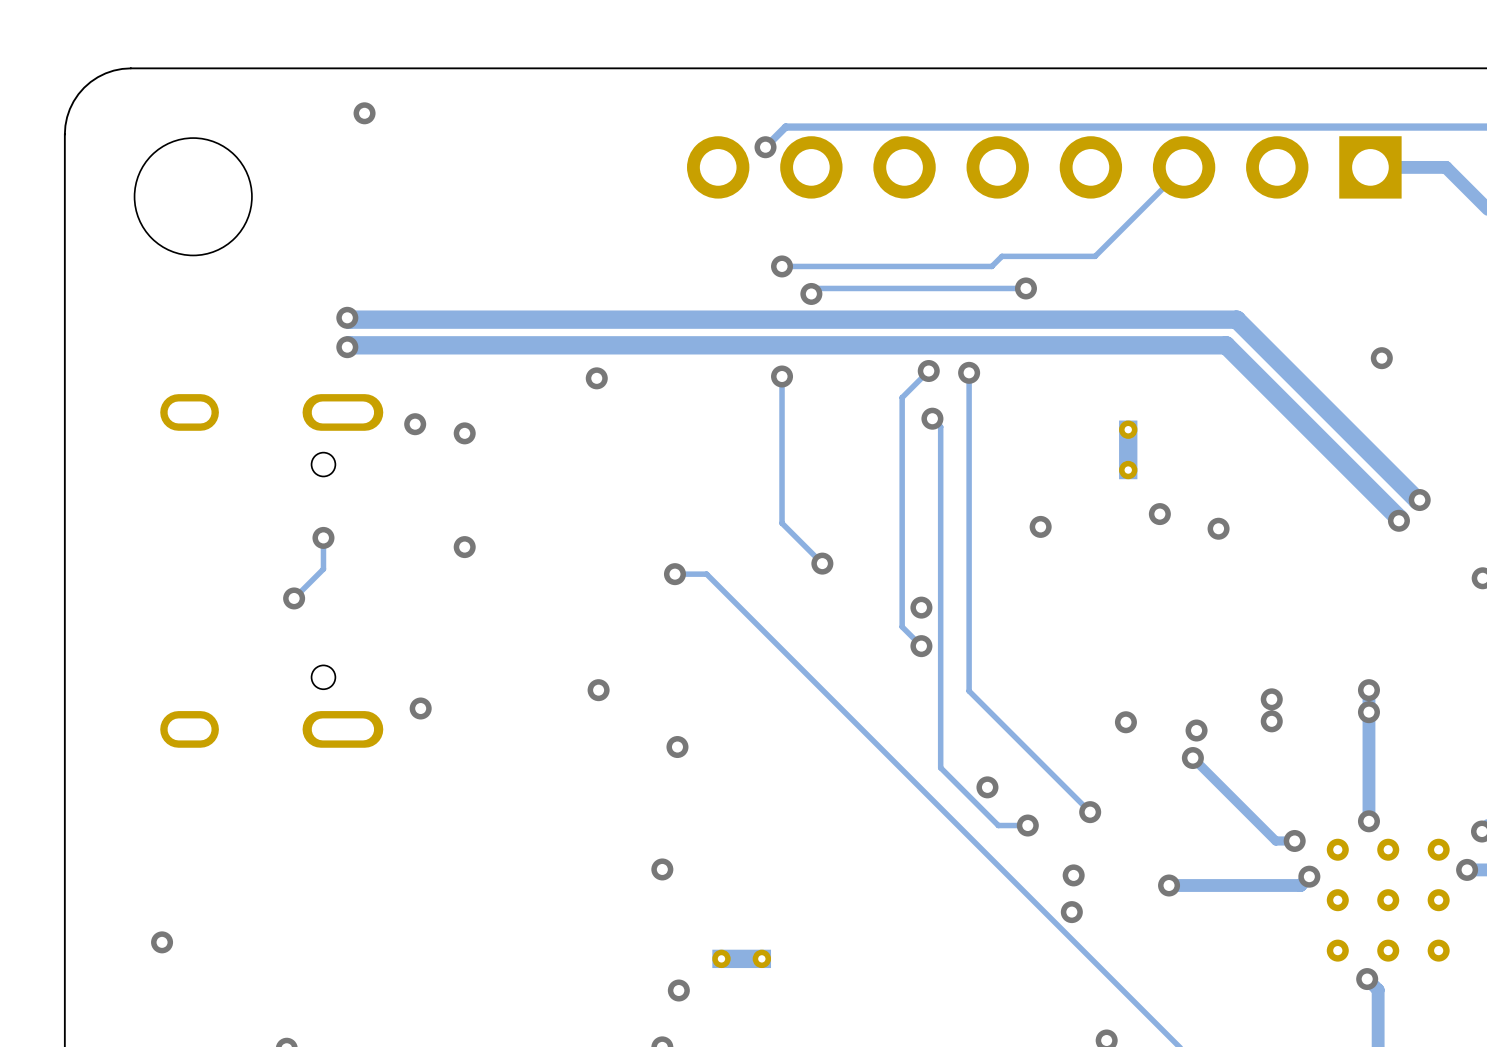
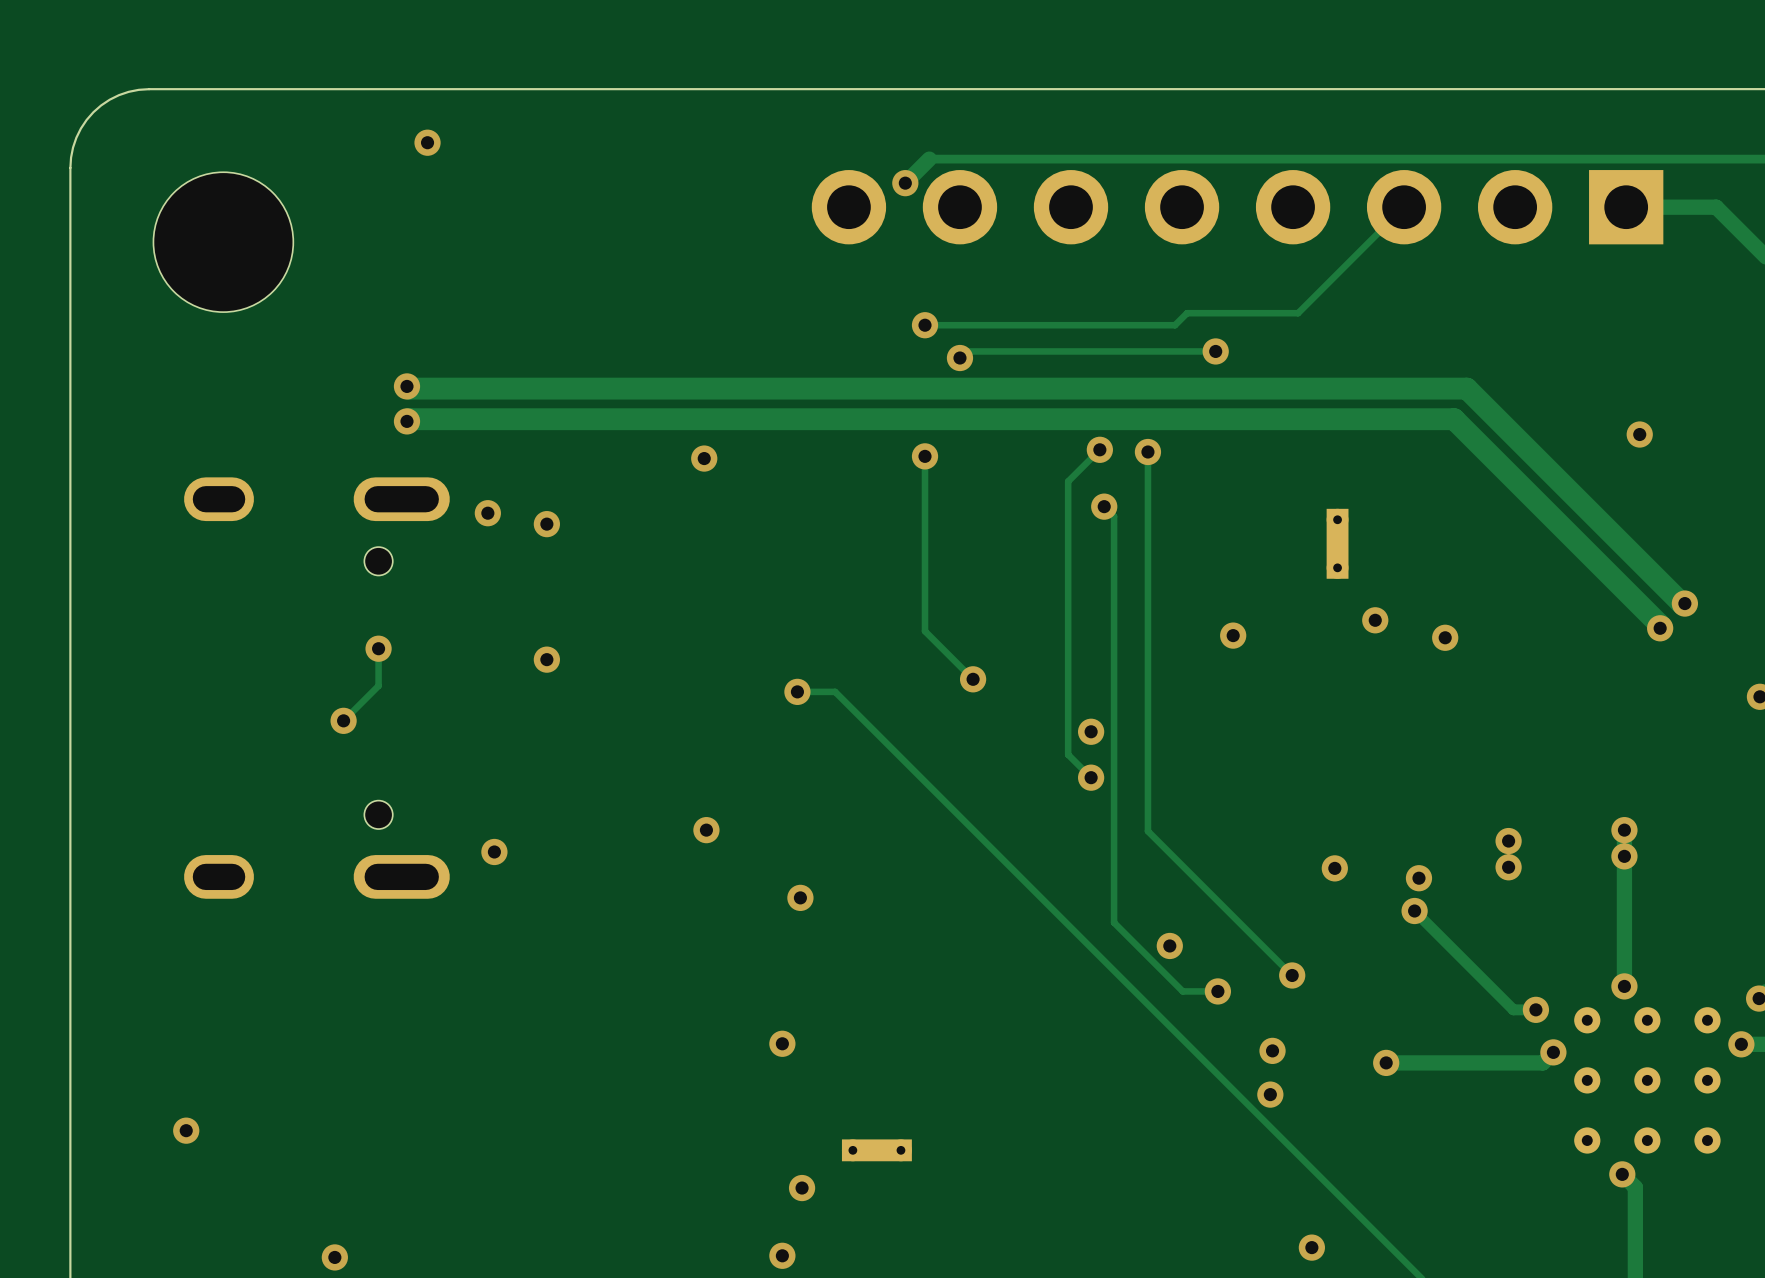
track width: thin (785, 127) (765, 147) -> thick (929, 159) (905, 183)

